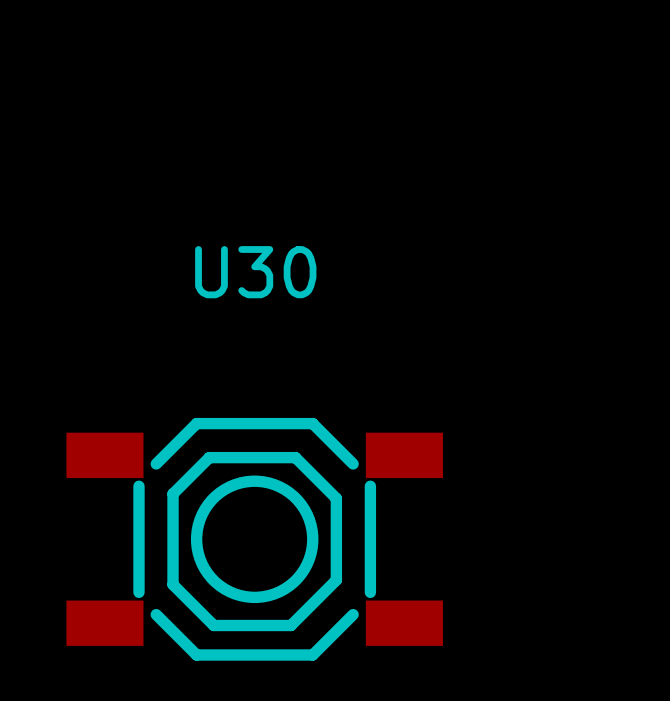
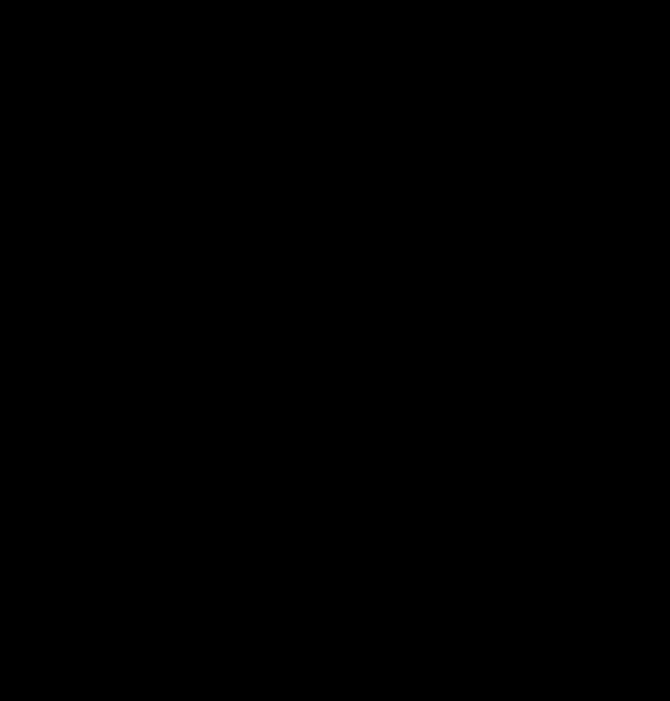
U30: (254, 539) -> none

